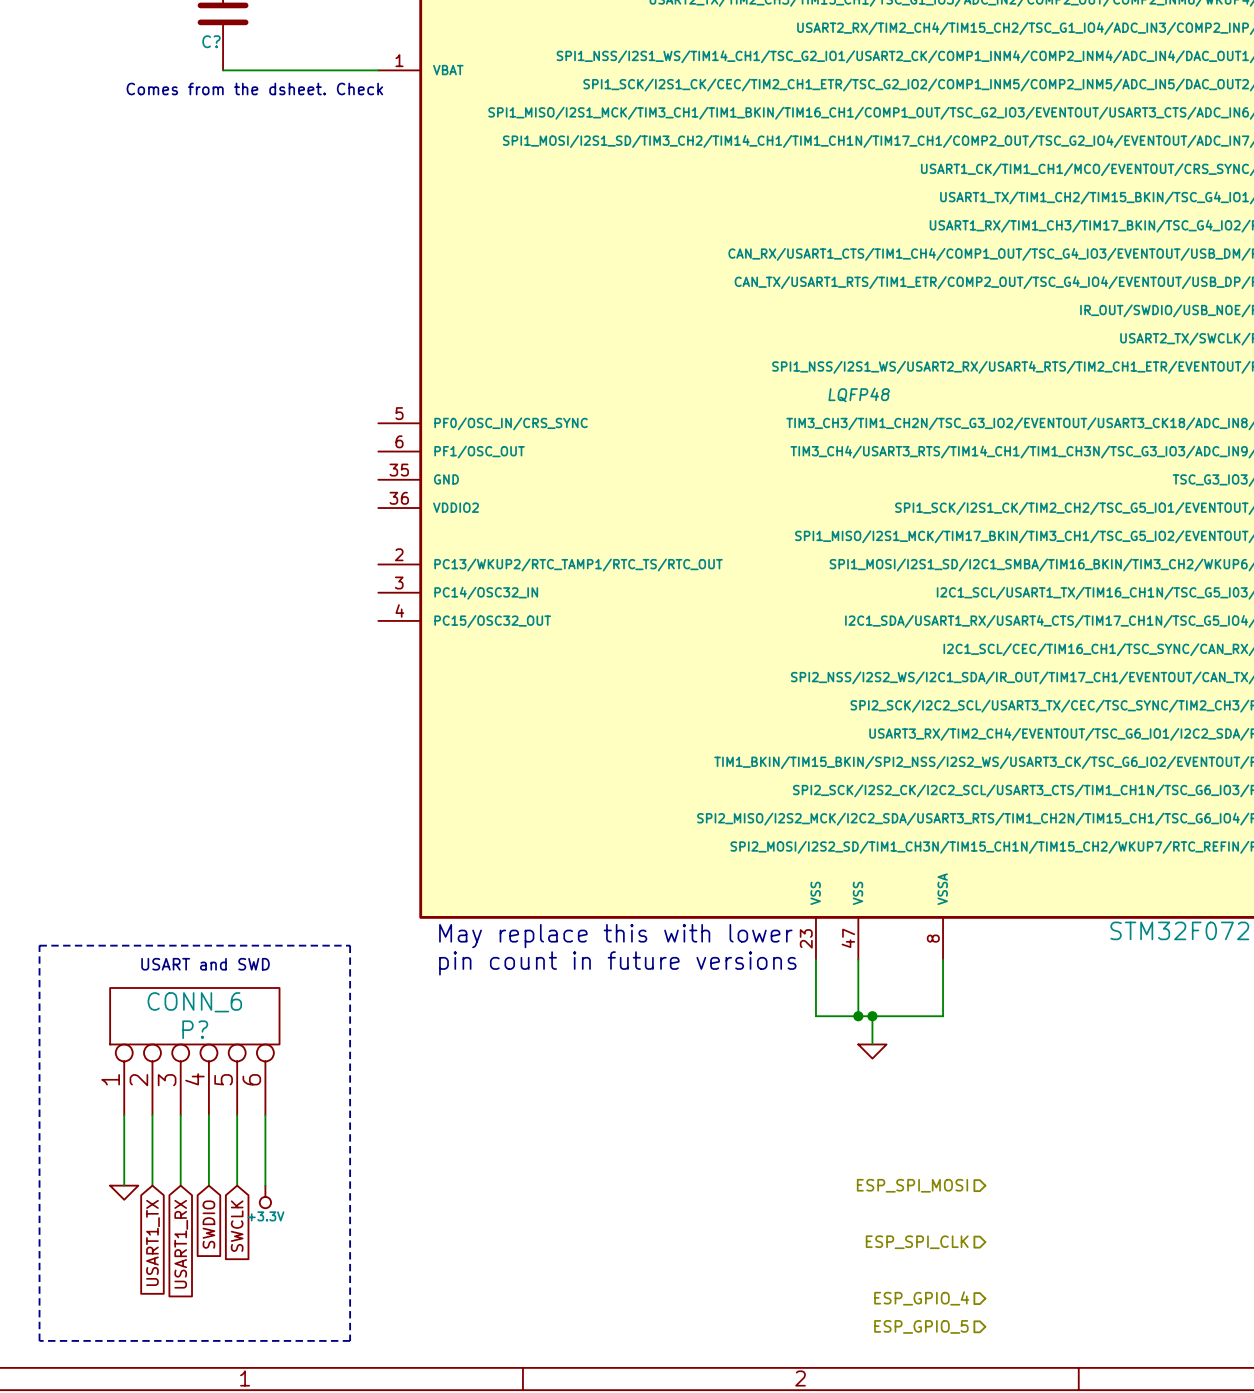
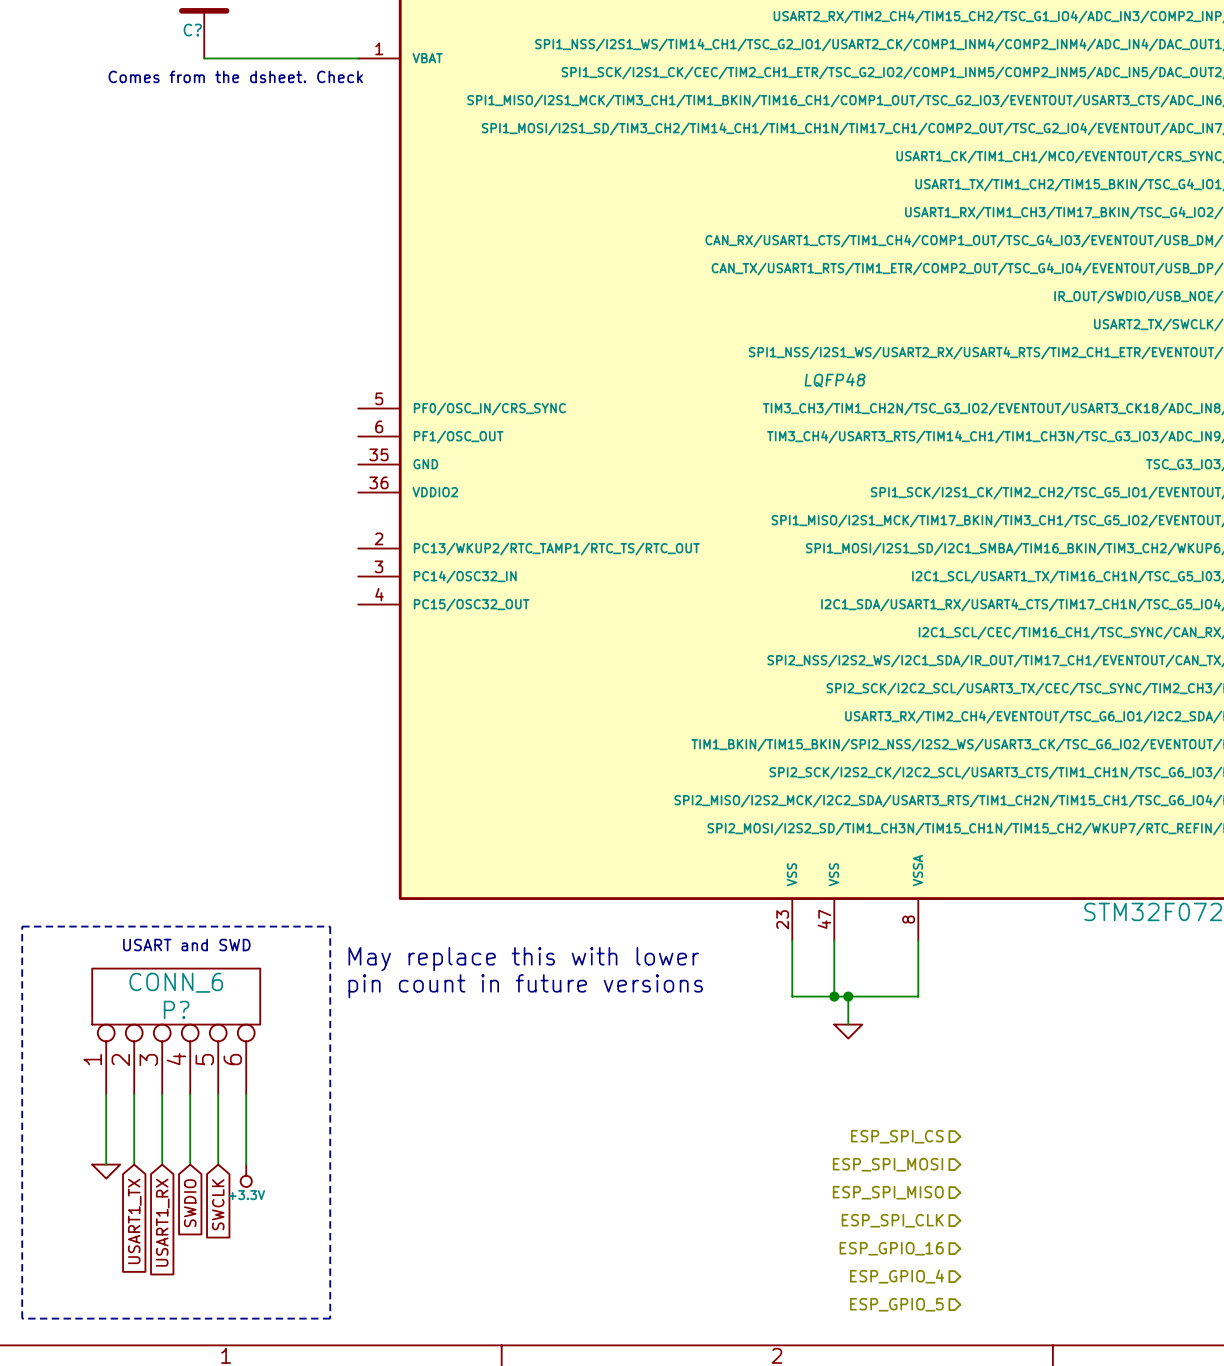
text position: May replace this with lower (615, 936) -> May replace this with lower (523, 959)
text position: pin count in future versions (617, 963) -> pin count in future versions (525, 986)
hierarchical label: none -> ESP_SPI_CS (897, 1136)
hierarchical label: none -> ESP_SPI_MISO (888, 1192)
hierarchical label: none -> ESP_GPIO_16 (891, 1248)

